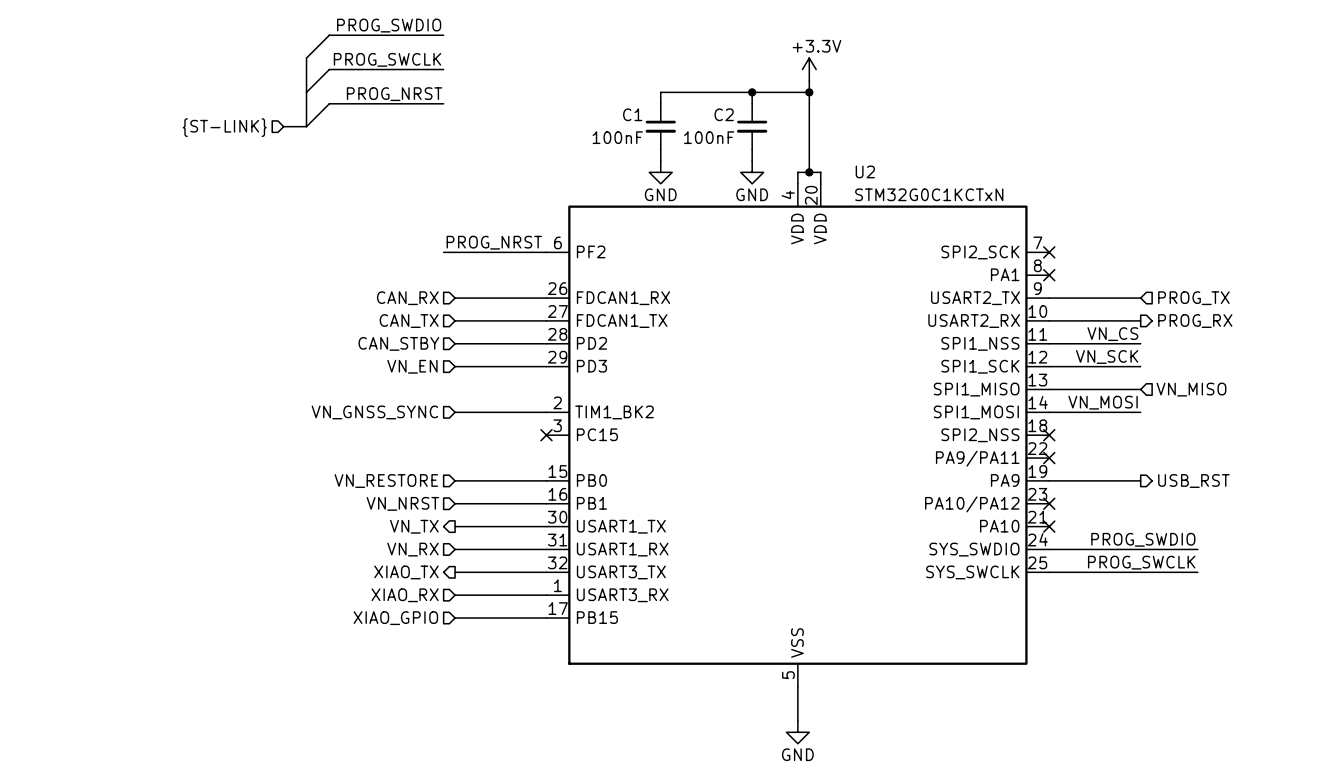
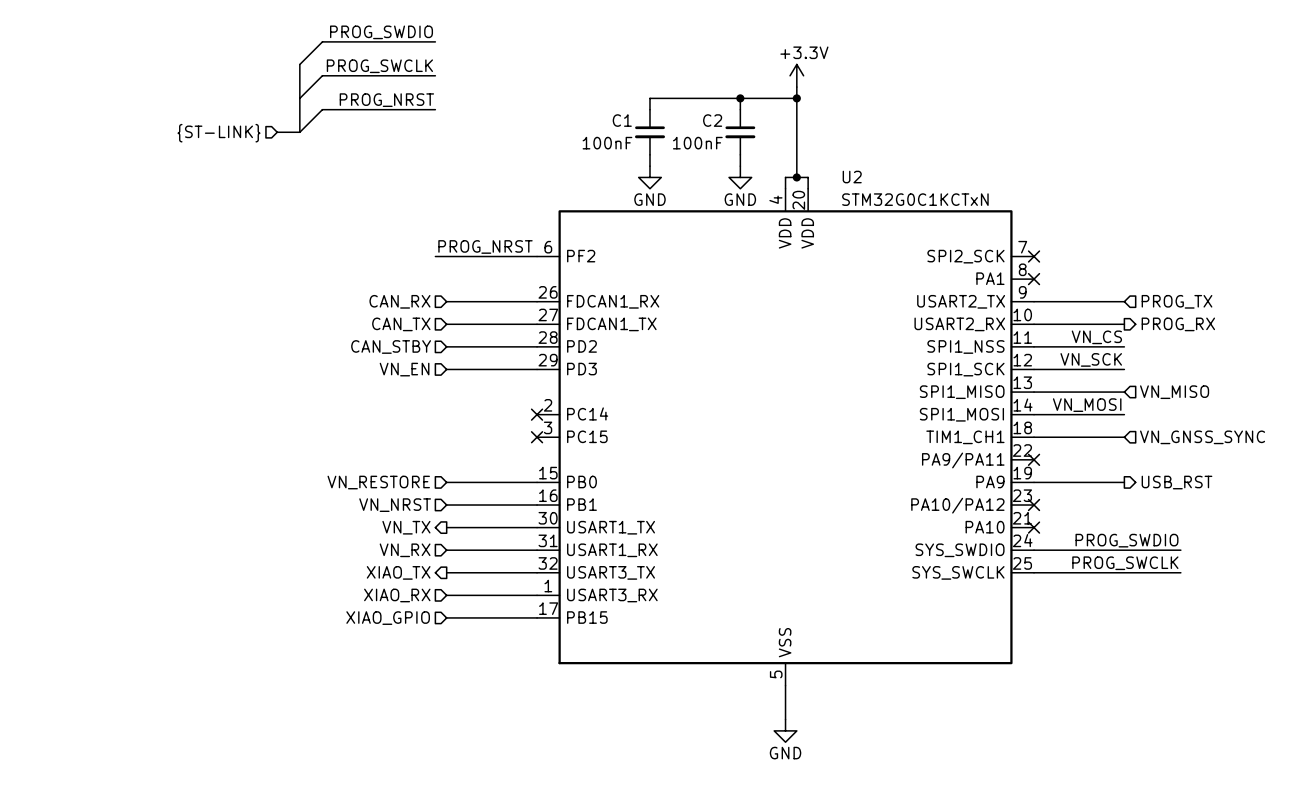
hierarchical label: VN_GNSS_SYNC (374, 412) -> none
wire: (455, 412) (546, 412) -> none
no-connect mark: none -> (537, 414)
U2 pin name: TIM1_BK2 (614, 412) -> PC14 (587, 413)
U2 pin name: SPI2_NSS (980, 435) -> TIM1_CH1 (965, 437)
wire: none -> (1034, 437) (1124, 437)
no-connect mark: (1049, 435) -> none
hierarchical label: none -> VN_GNSS_SYNC (1202, 437)

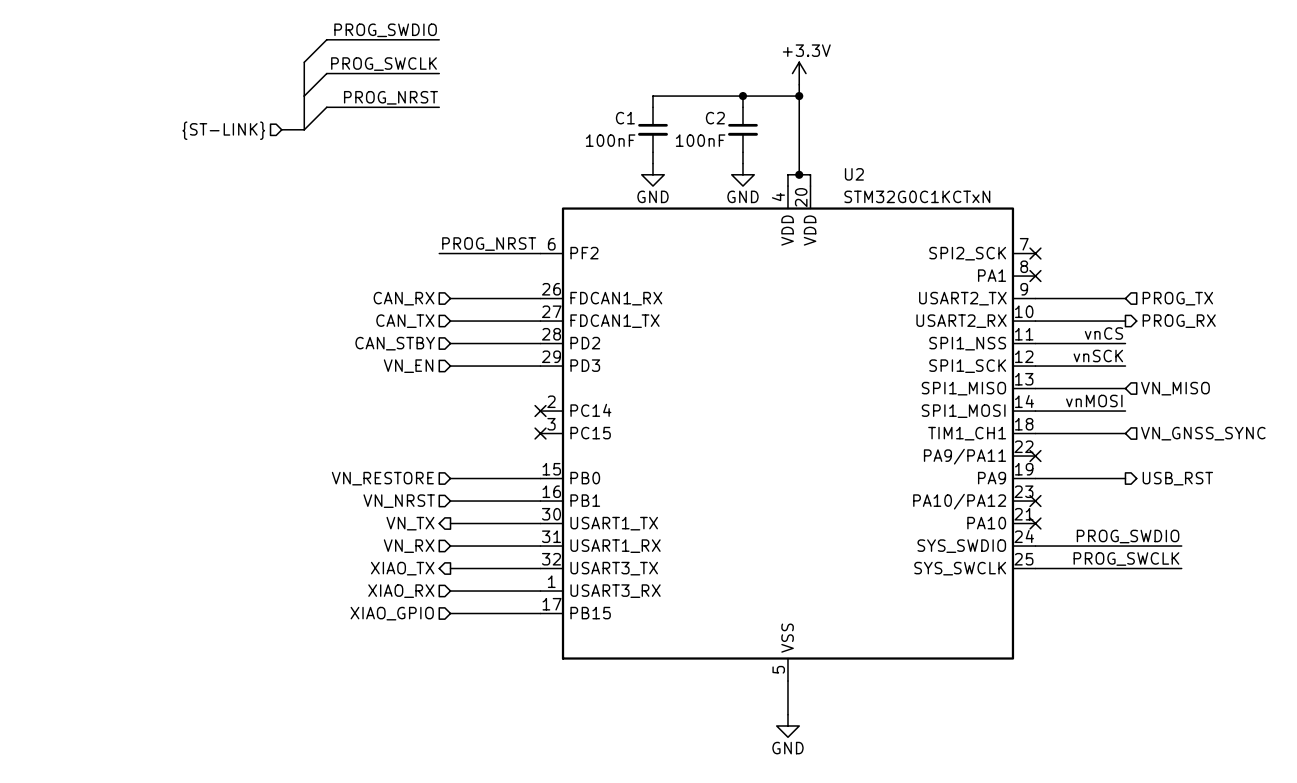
label: VN_CS (1096, 337) -> vnCS (1103, 333)
label: VN_SCK (1091, 359) -> vnSCK (1098, 355)
label: VN_MOSI (1087, 405) -> vnMOSI (1094, 400)

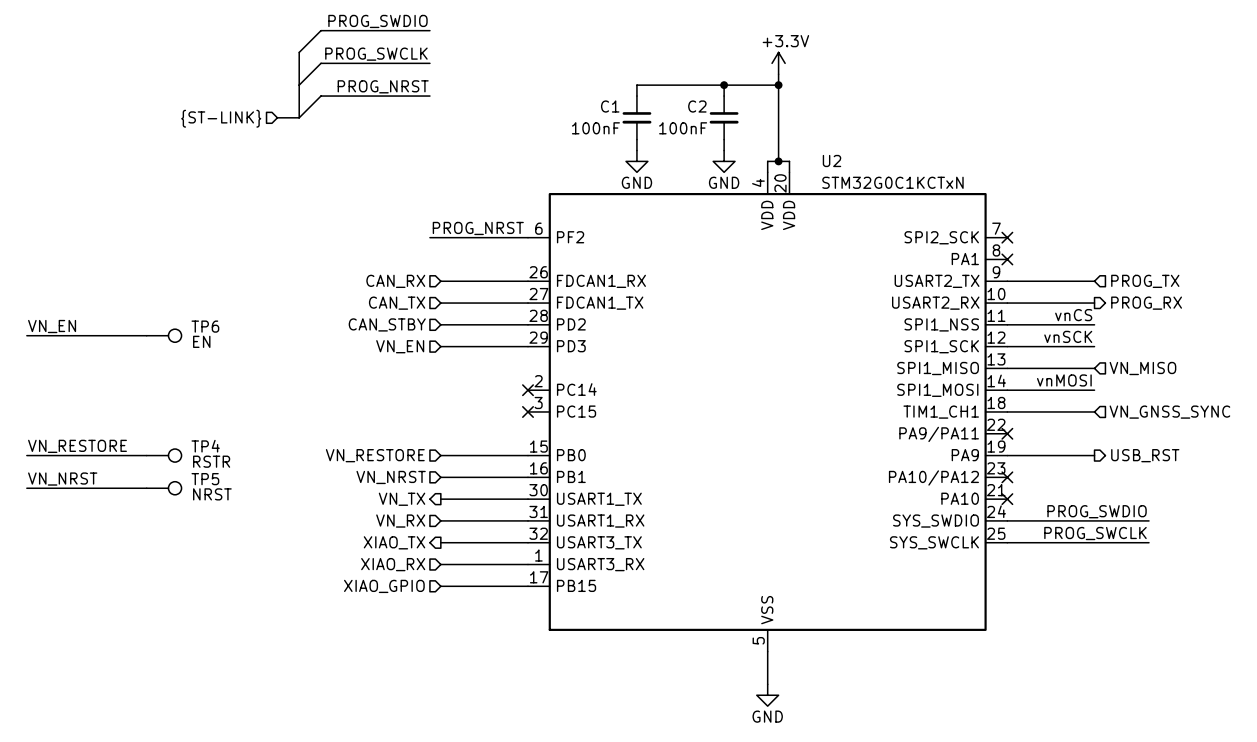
label: none -> VN_EN (52, 326)
wire: none -> (26, 335) (146, 335)
TP6: none -> EN (164, 335)
label: none -> VN_RESTORE (77, 446)
wire: none -> (26, 455) (146, 455)
TP4: none -> RSTR (164, 455)
label: none -> VN_NRST (62, 479)
wire: none -> (26, 488) (146, 488)
TP5: none -> NRST (164, 488)

